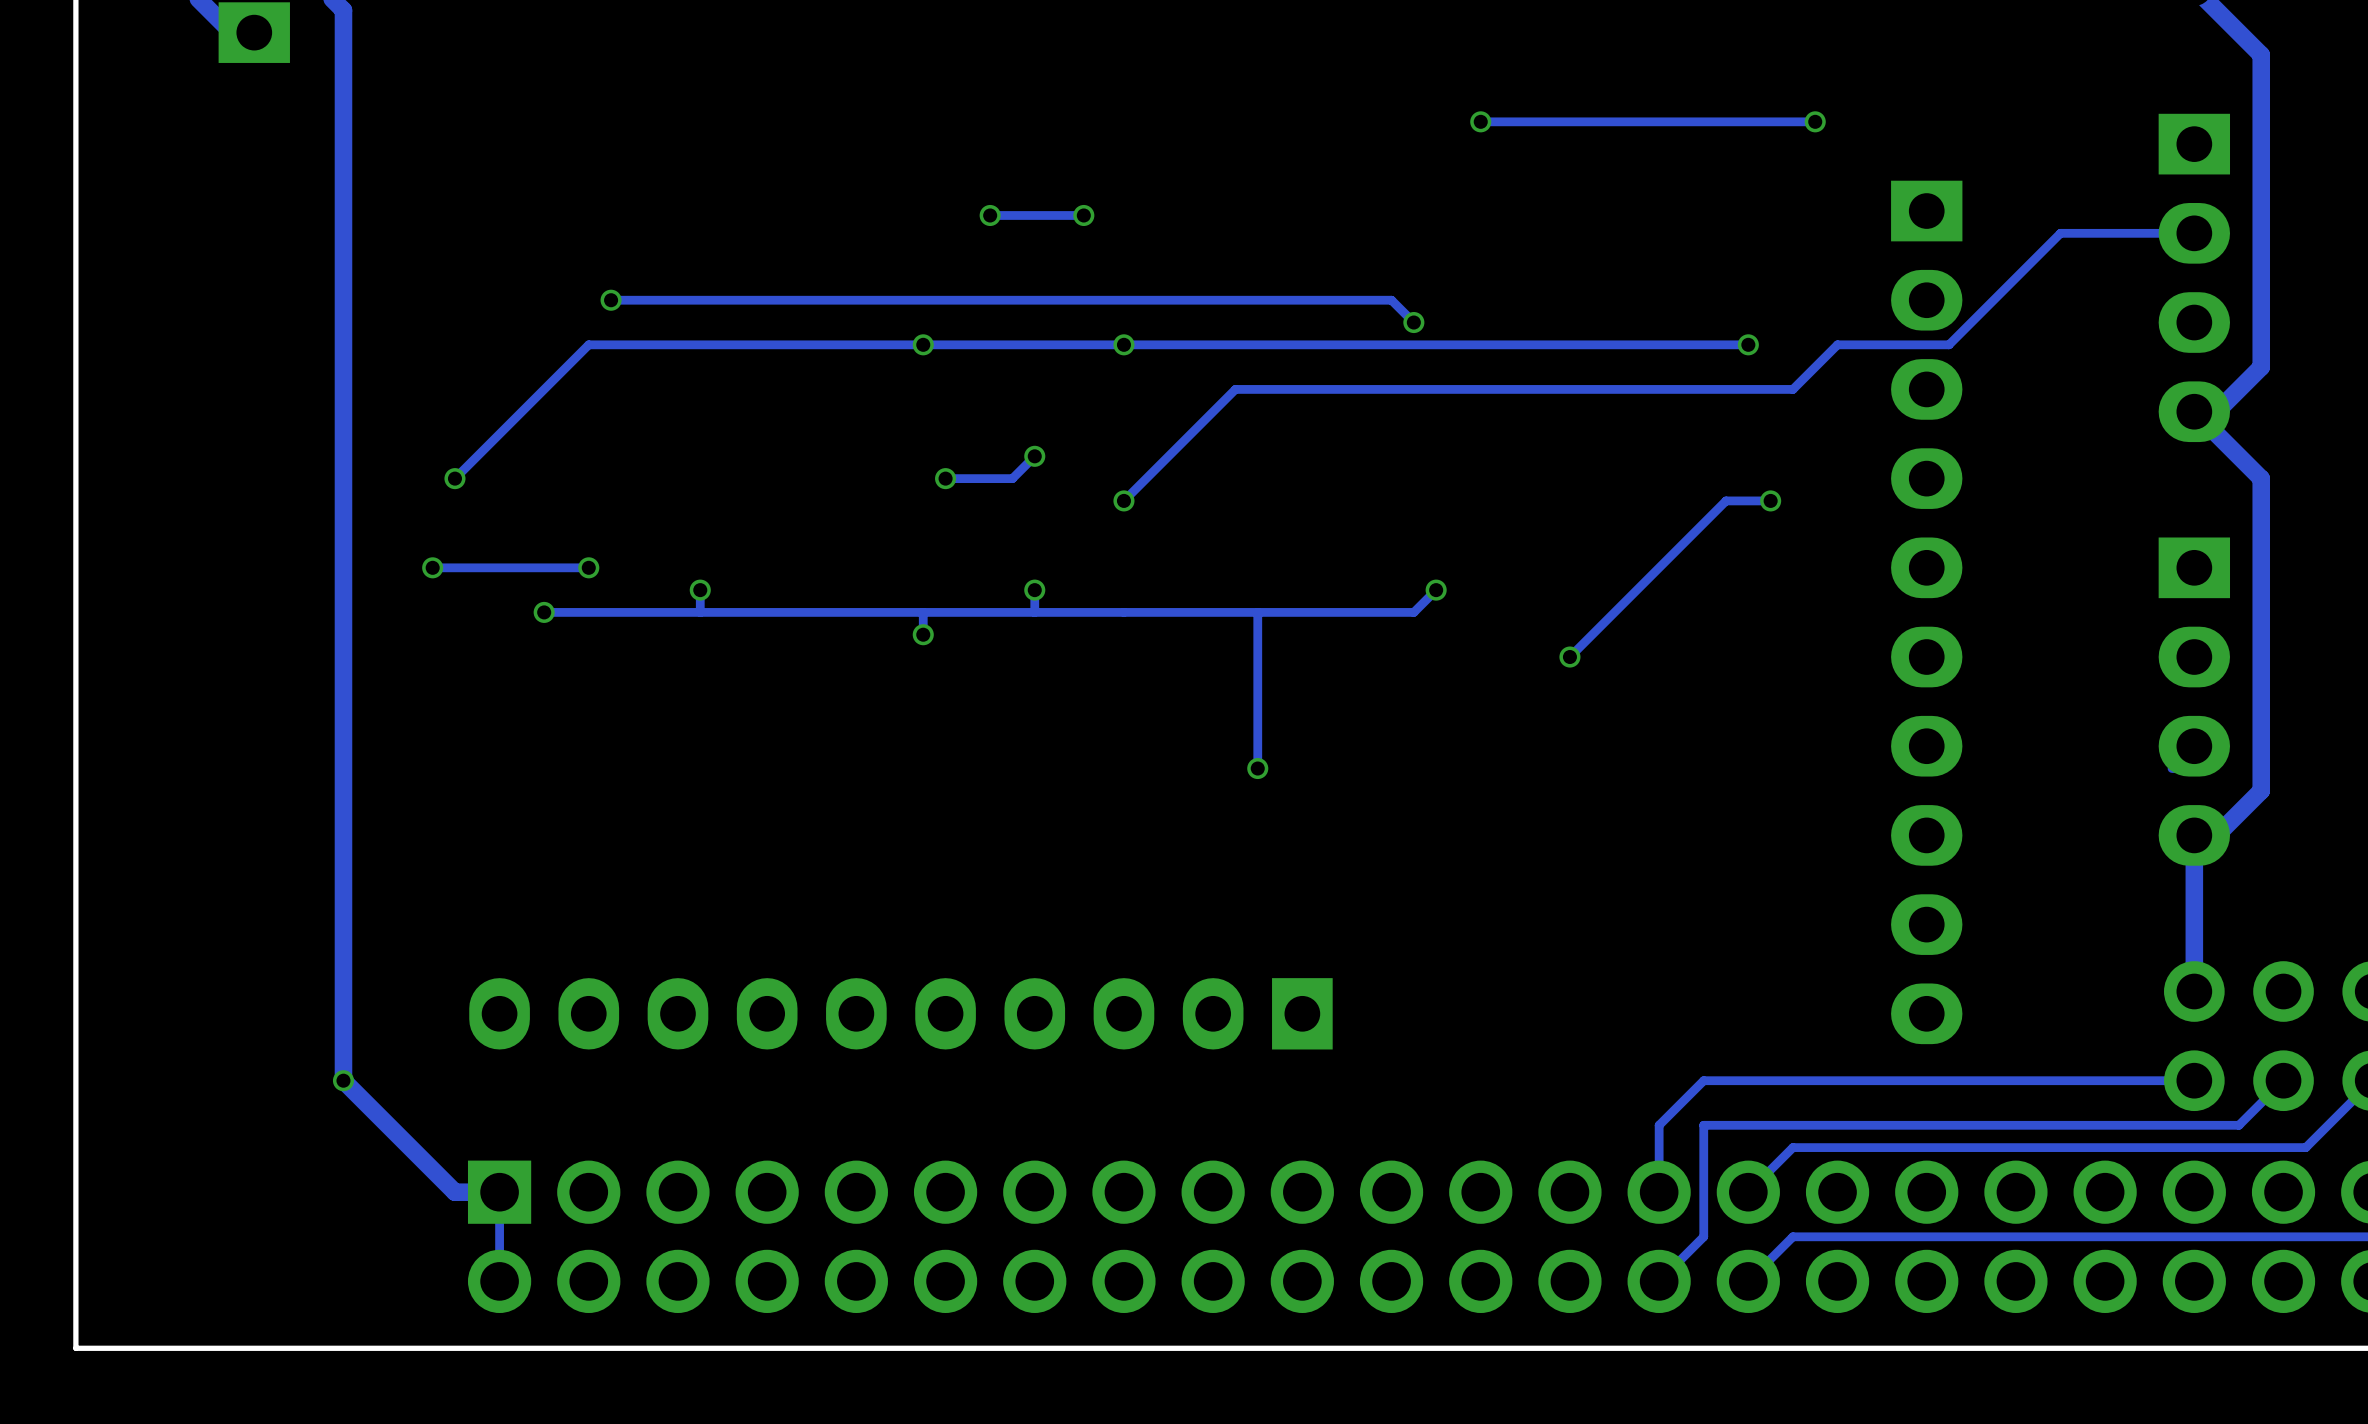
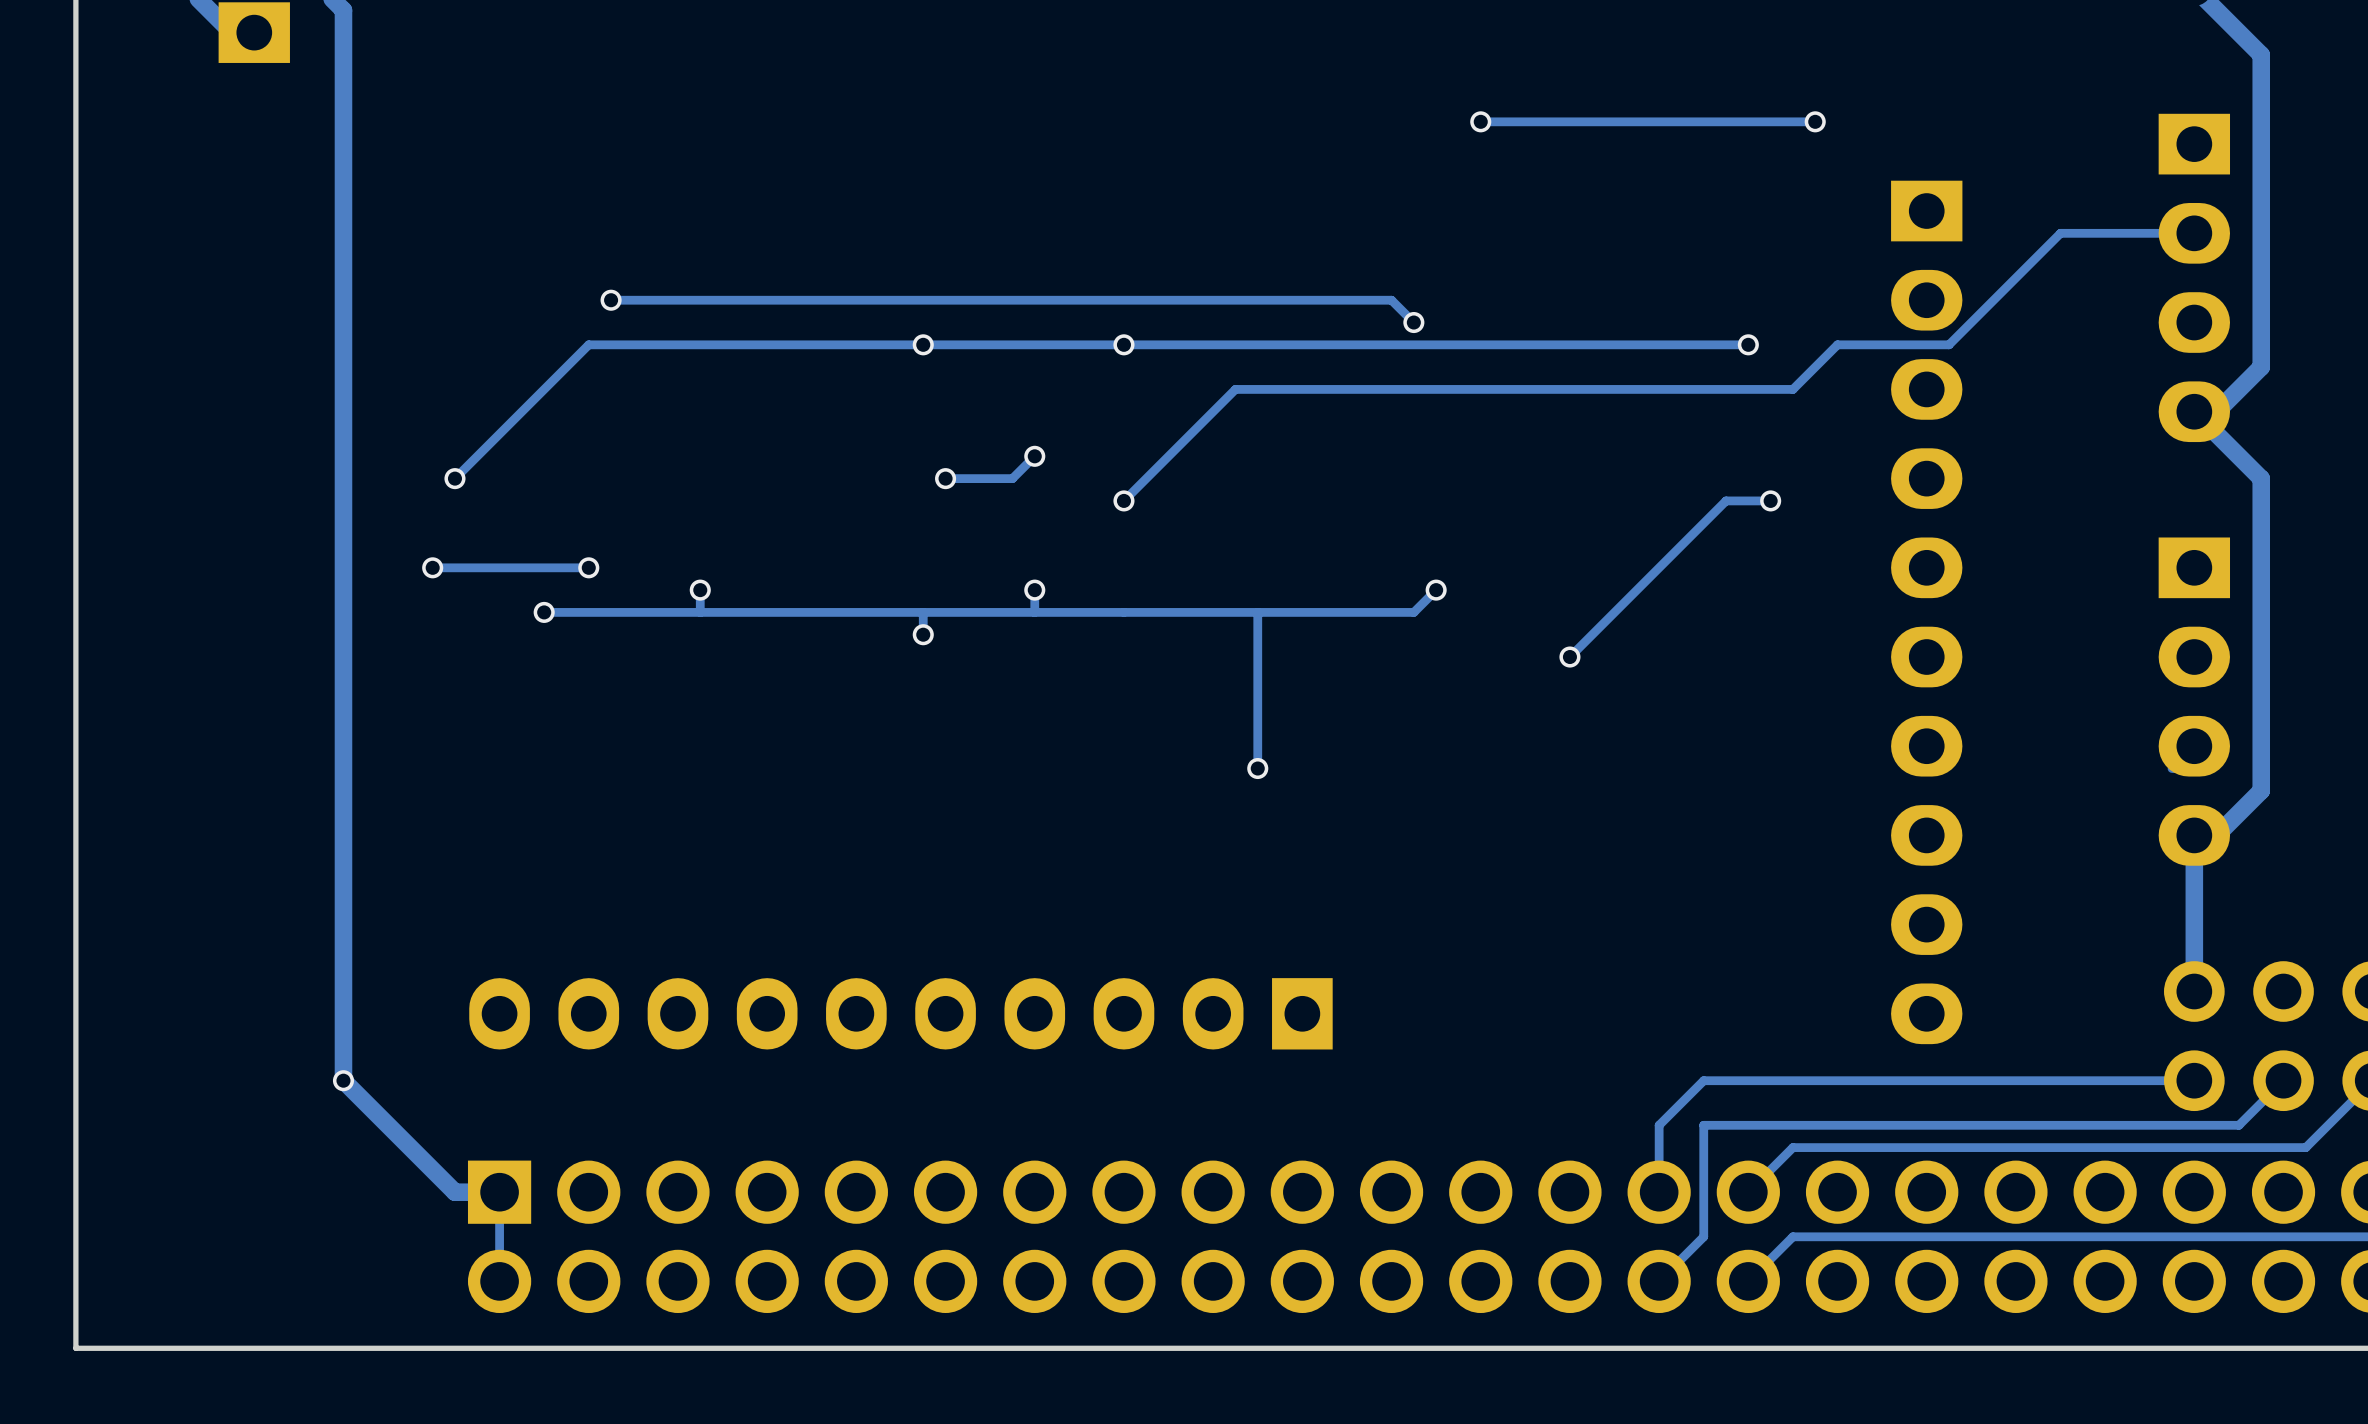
via: (990, 215) -> none
track: (1083, 215) (990, 215) -> none
via: (1083, 215) -> none

